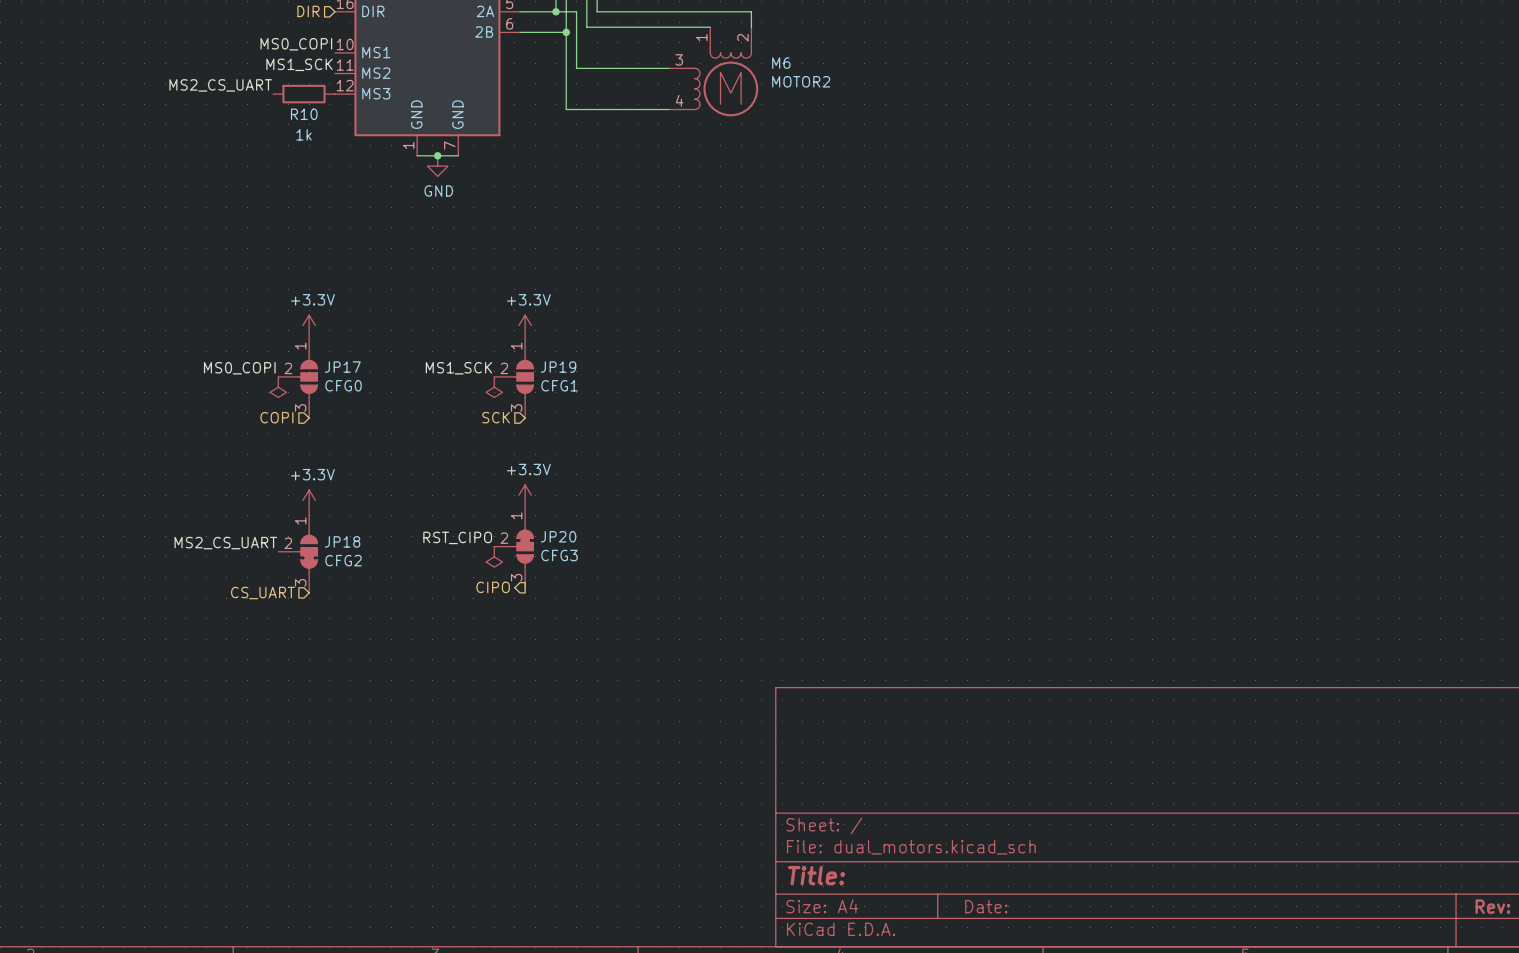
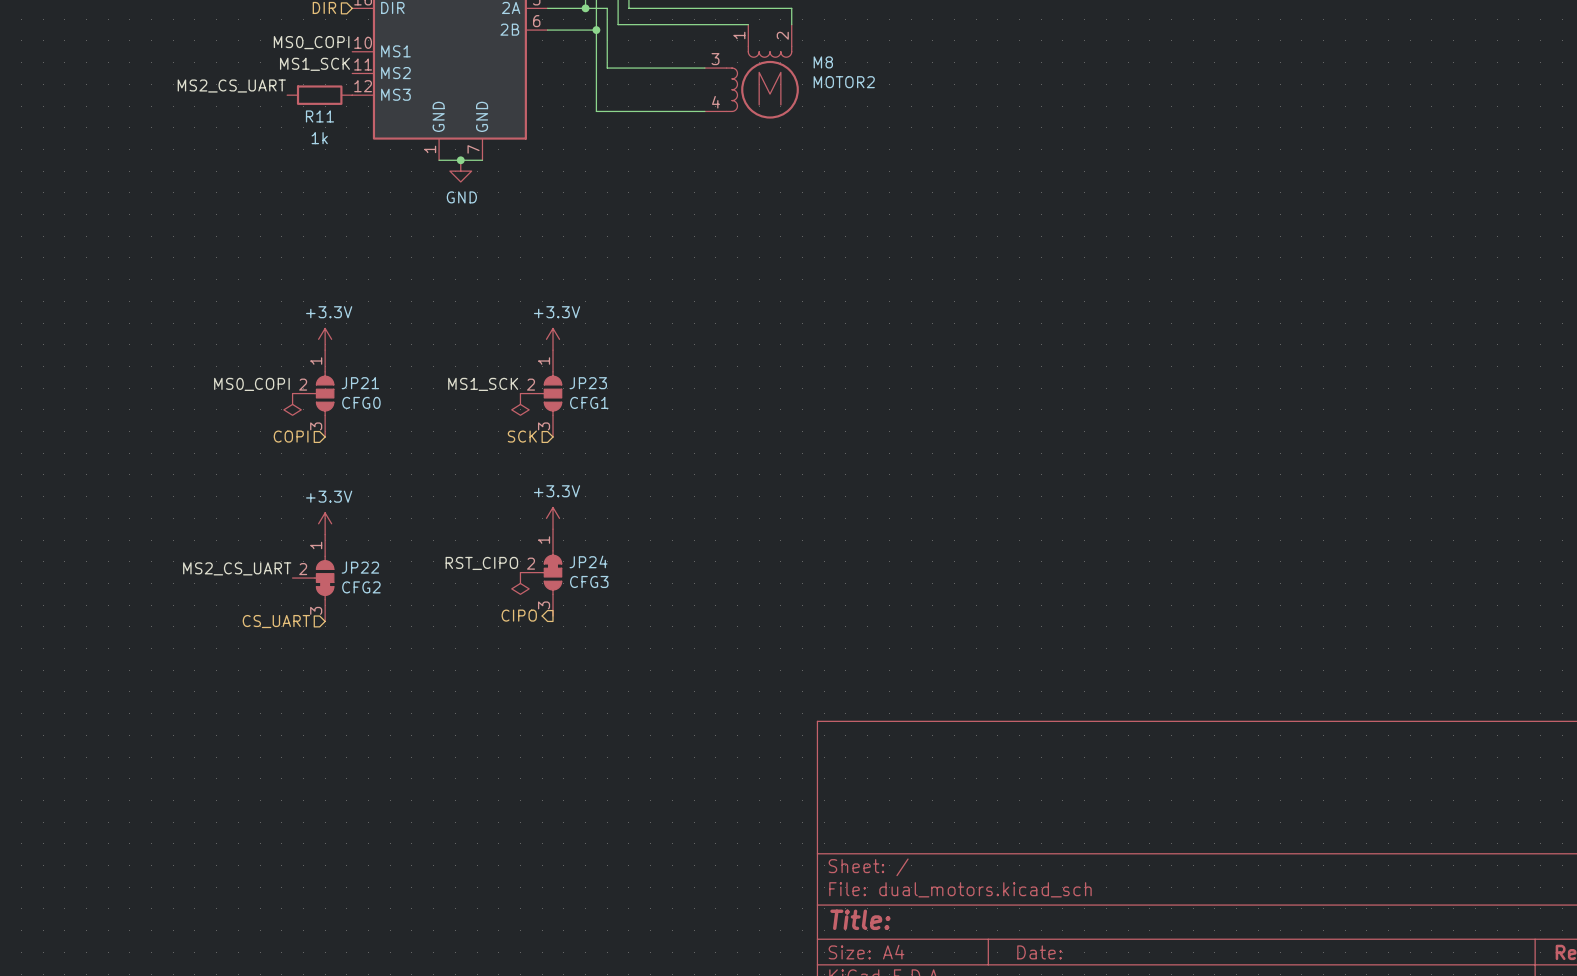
M6 name: M6 (781, 63) -> M8 (823, 62)
R10 name: R10 (304, 114) -> R11 (319, 116)
JP17 name: JP17 (342, 367) -> JP21 (360, 383)
JP19 name: JP19 (558, 367) -> JP23 (588, 383)
JP20 name: JP20 (558, 536) -> JP24 (588, 561)
JP18 name: JP18 (342, 541) -> JP22 (360, 567)

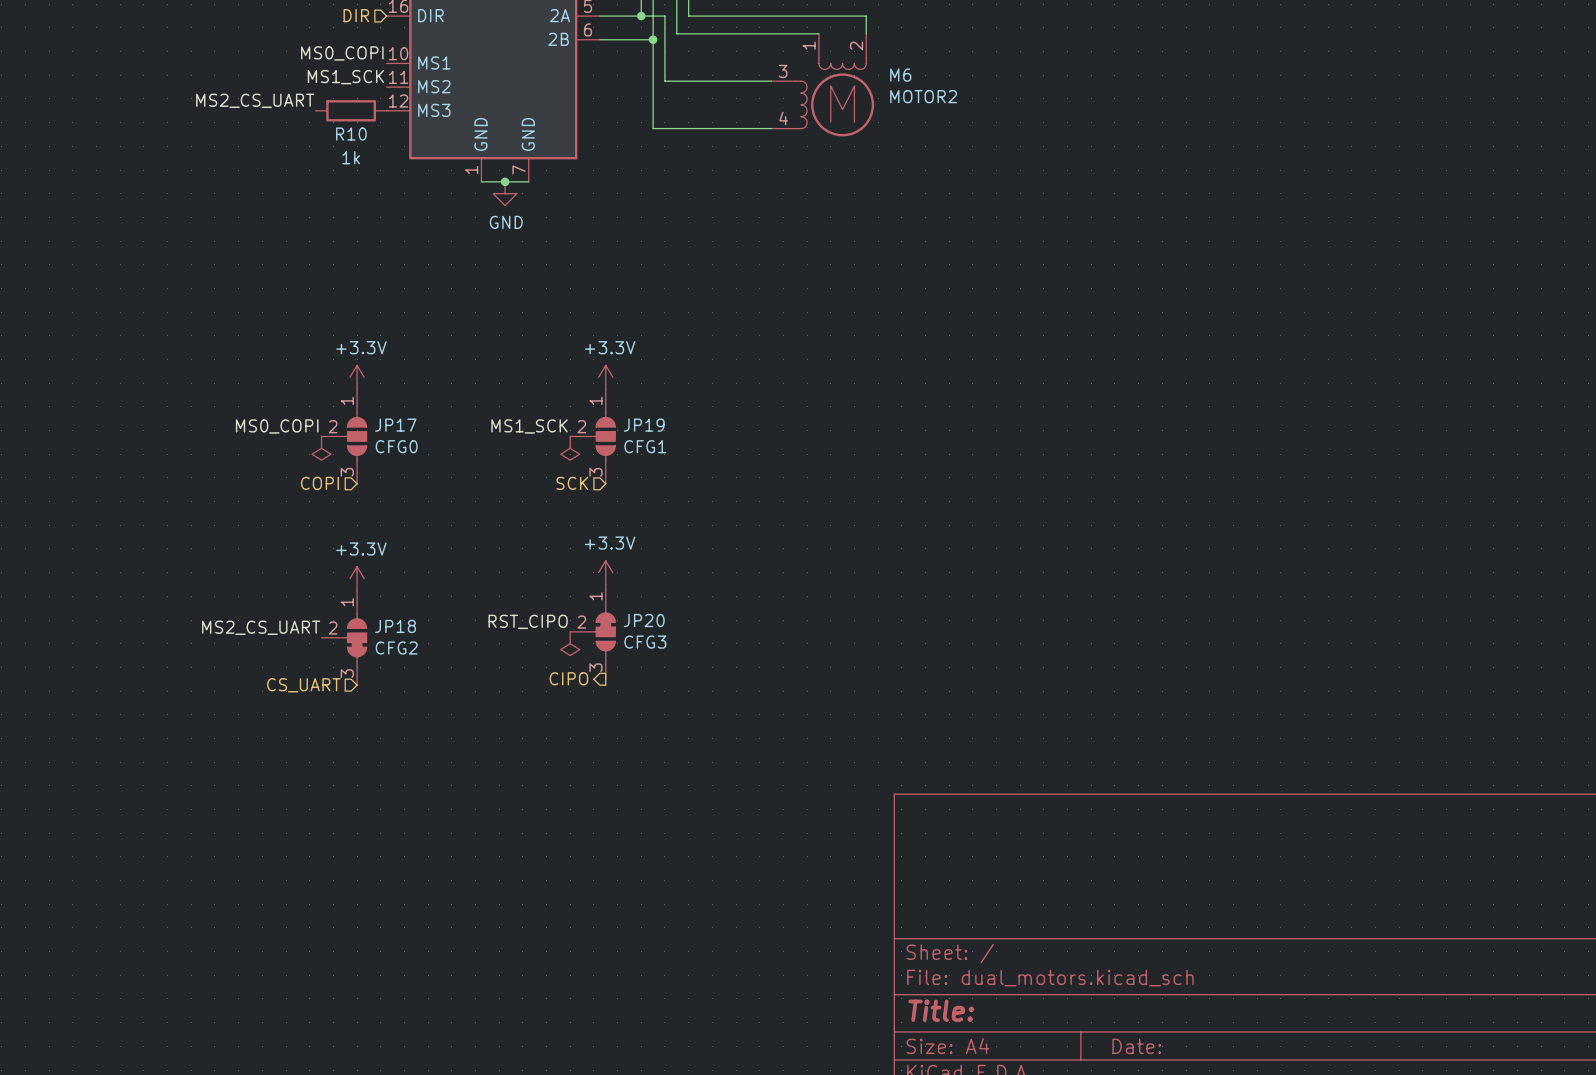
M8 name: M8 (823, 62) -> M6 (900, 75)
R11 name: R11 (319, 116) -> R10 (351, 134)
JP21 name: JP21 (360, 383) -> JP17 (395, 425)
JP23 name: JP23 (588, 383) -> JP19 (644, 425)
JP24 name: JP24 (588, 561) -> JP20 (644, 620)
JP22 name: JP22 (360, 567) -> JP18 (395, 626)

